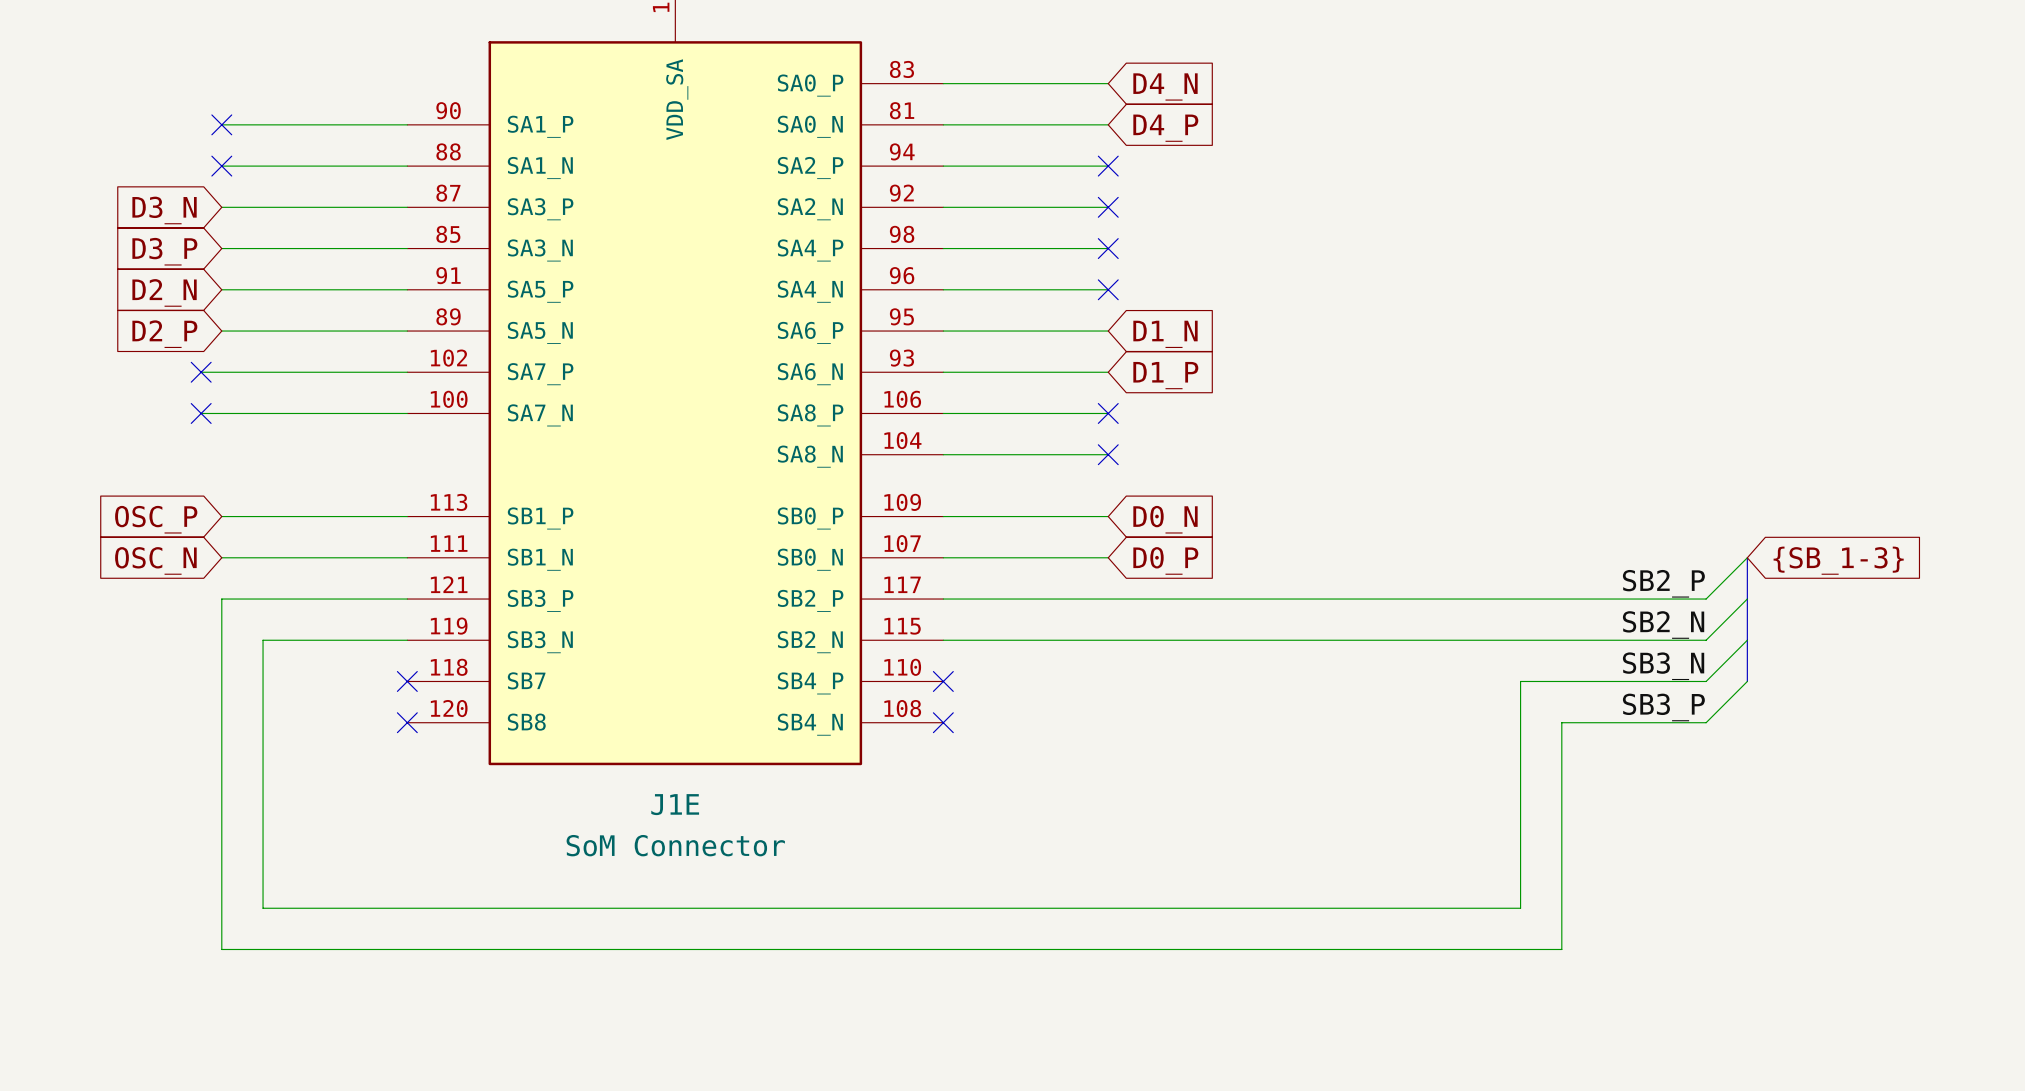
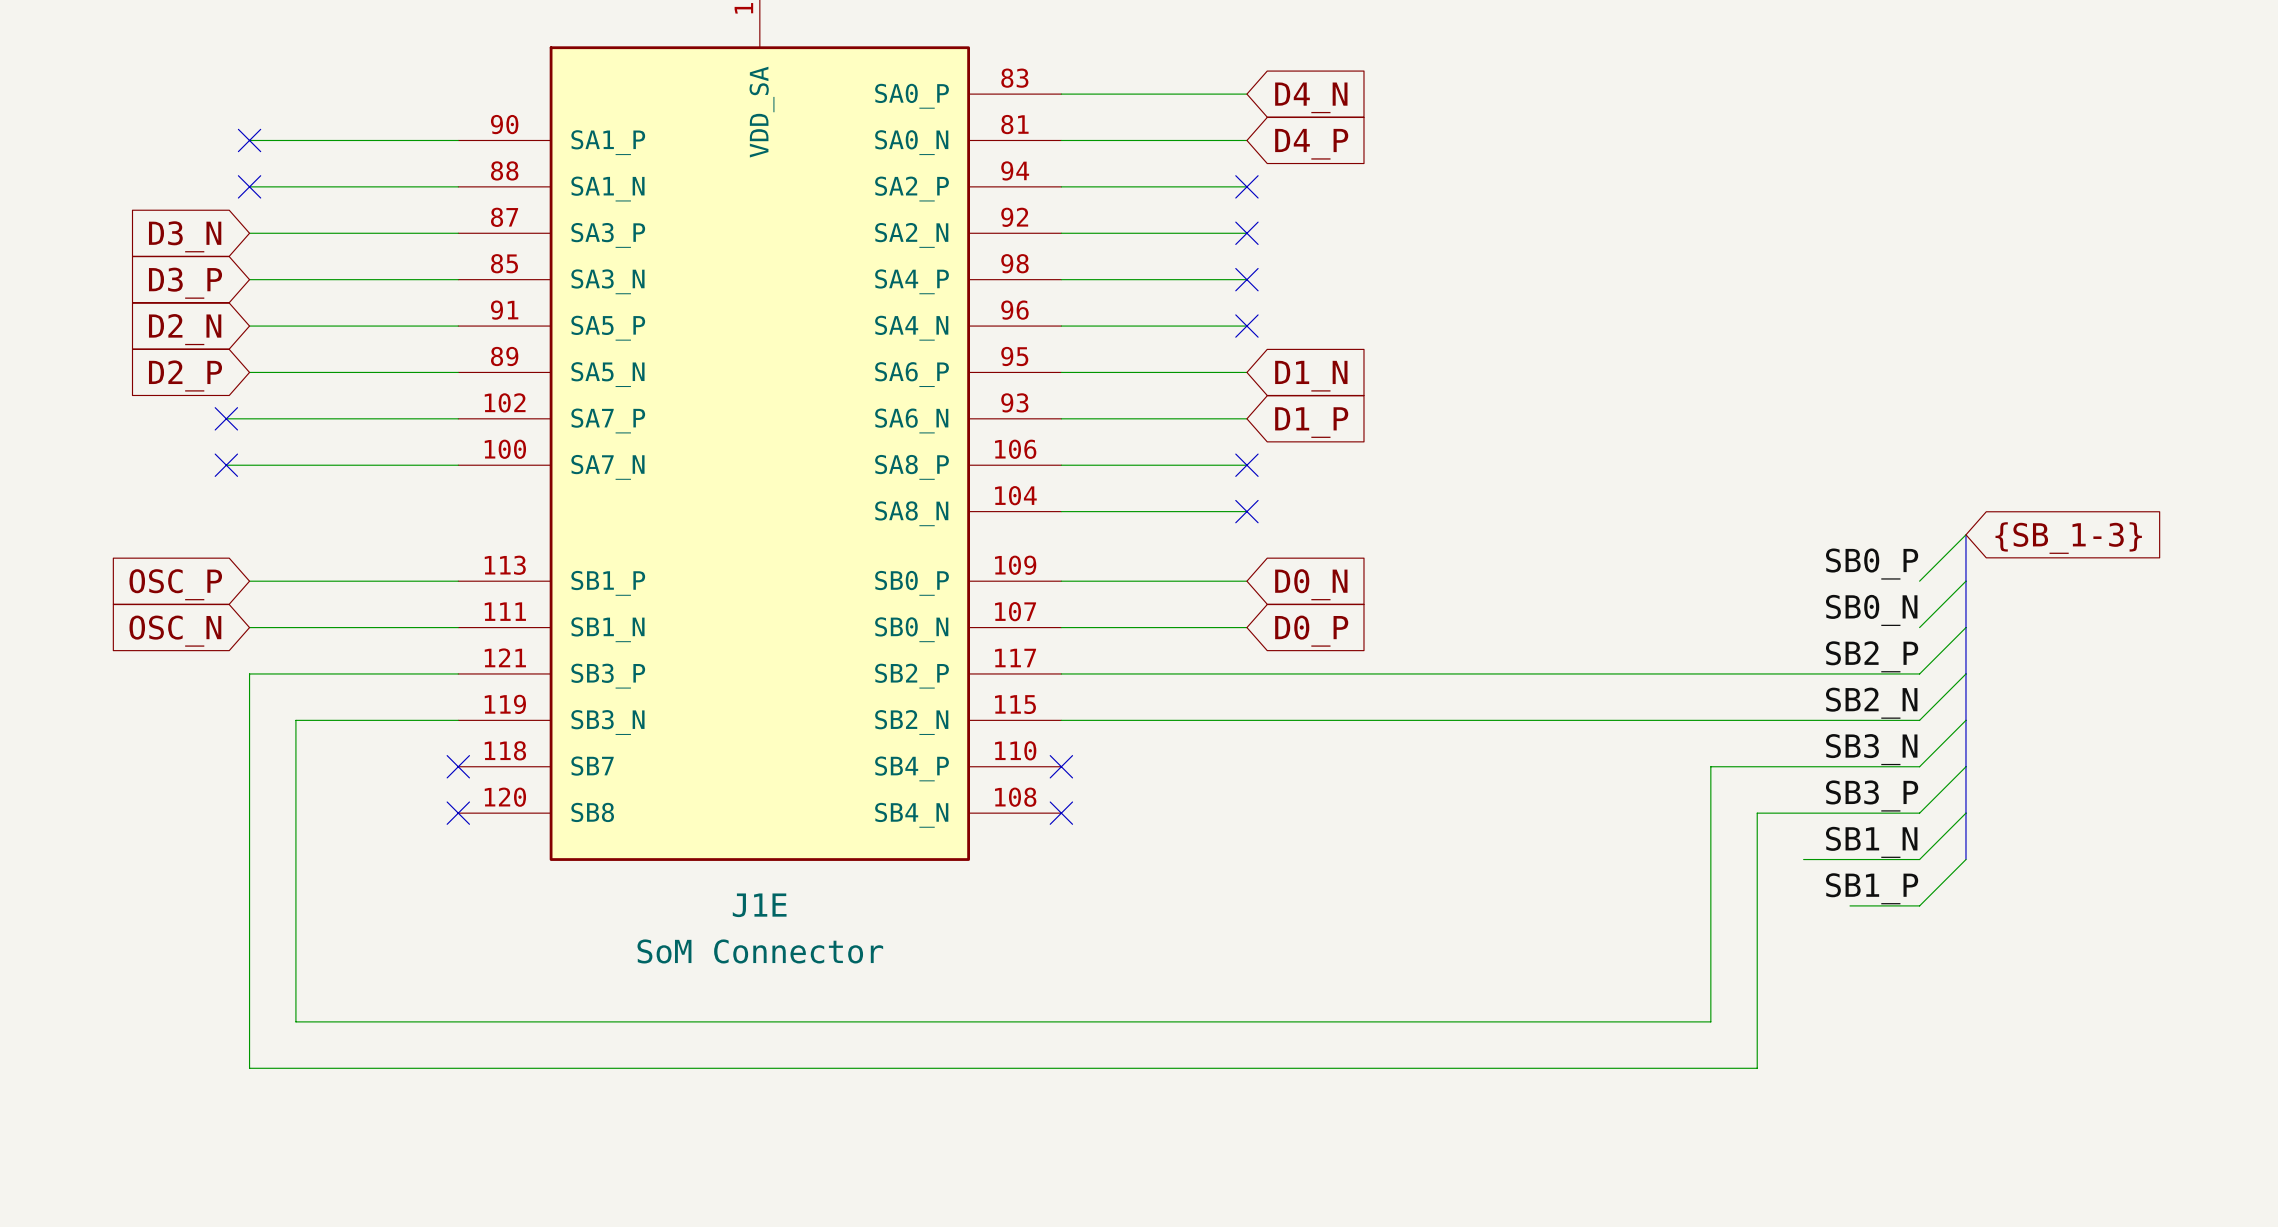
wire: none -> (1965, 534) (1919, 581)
bus: none -> (1965, 534) (1965, 627)
label: none -> SB0_P (1872, 564)
wire: none -> (1965, 581) (1919, 627)
label: none -> SB0_N (1871, 610)
global label position: {SB_1-3} (1838, 560) -> {SB_1-3} (2068, 538)
bus: none -> (1965, 766) (1965, 859)
wire: none -> (1965, 813) (1919, 859) (1803, 859)
label: none -> SB1_N (1871, 842)
wire: none -> (1965, 859) (1919, 905) (1850, 905)
label: none -> SB1_P (1872, 888)

